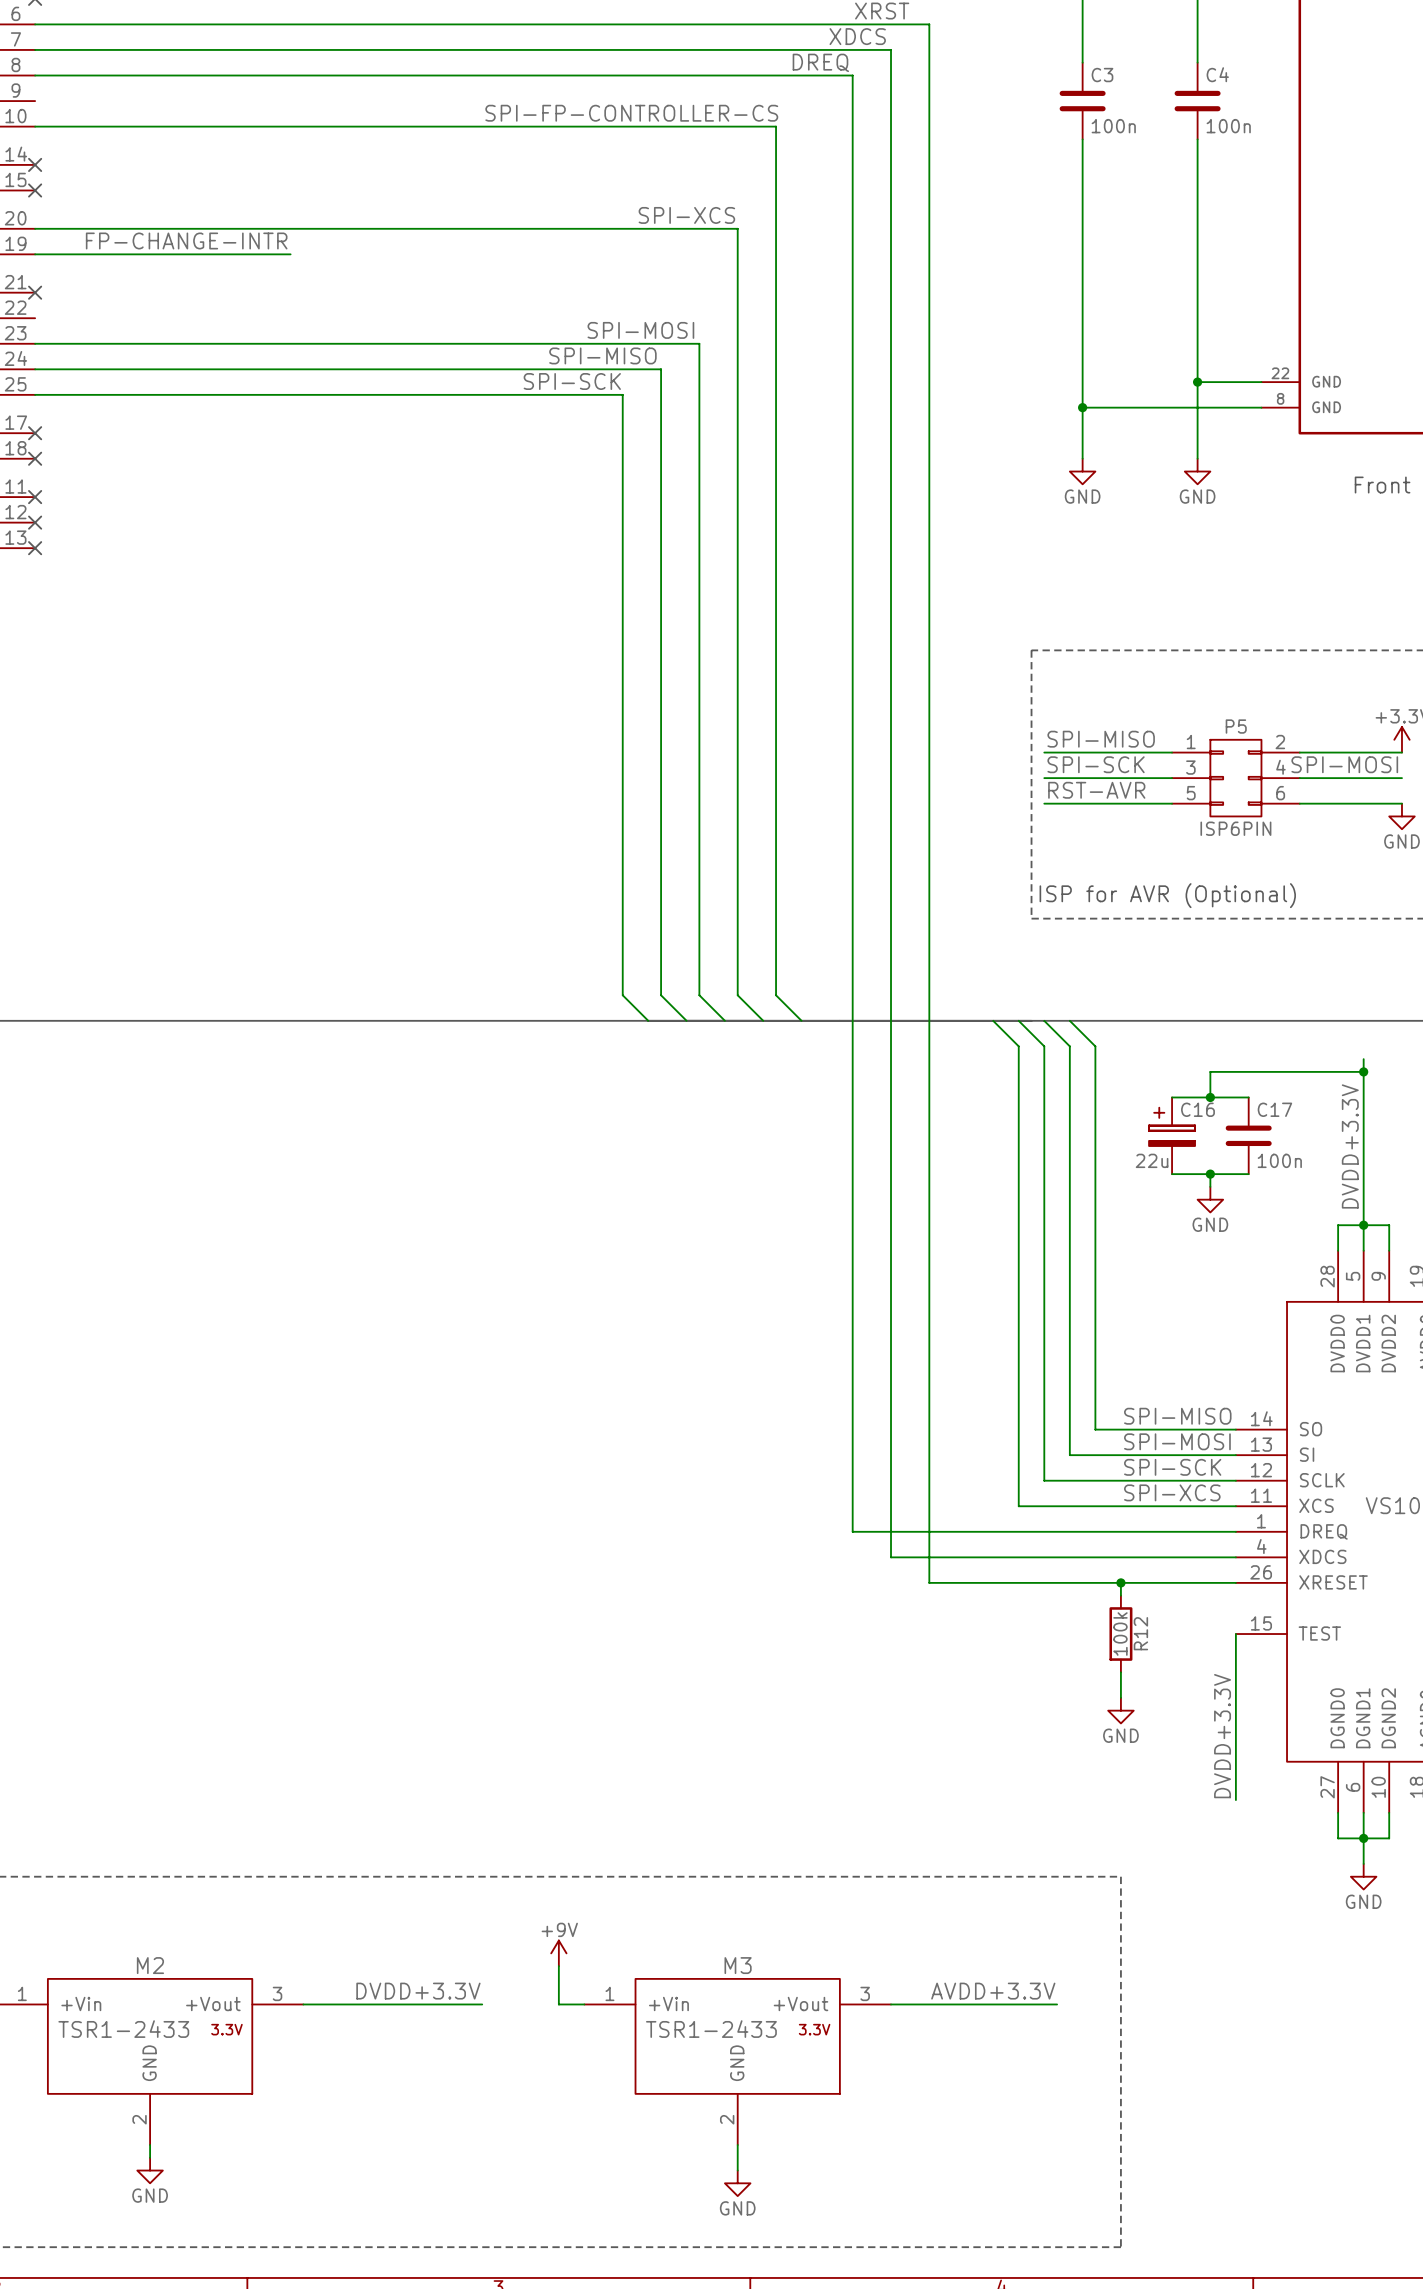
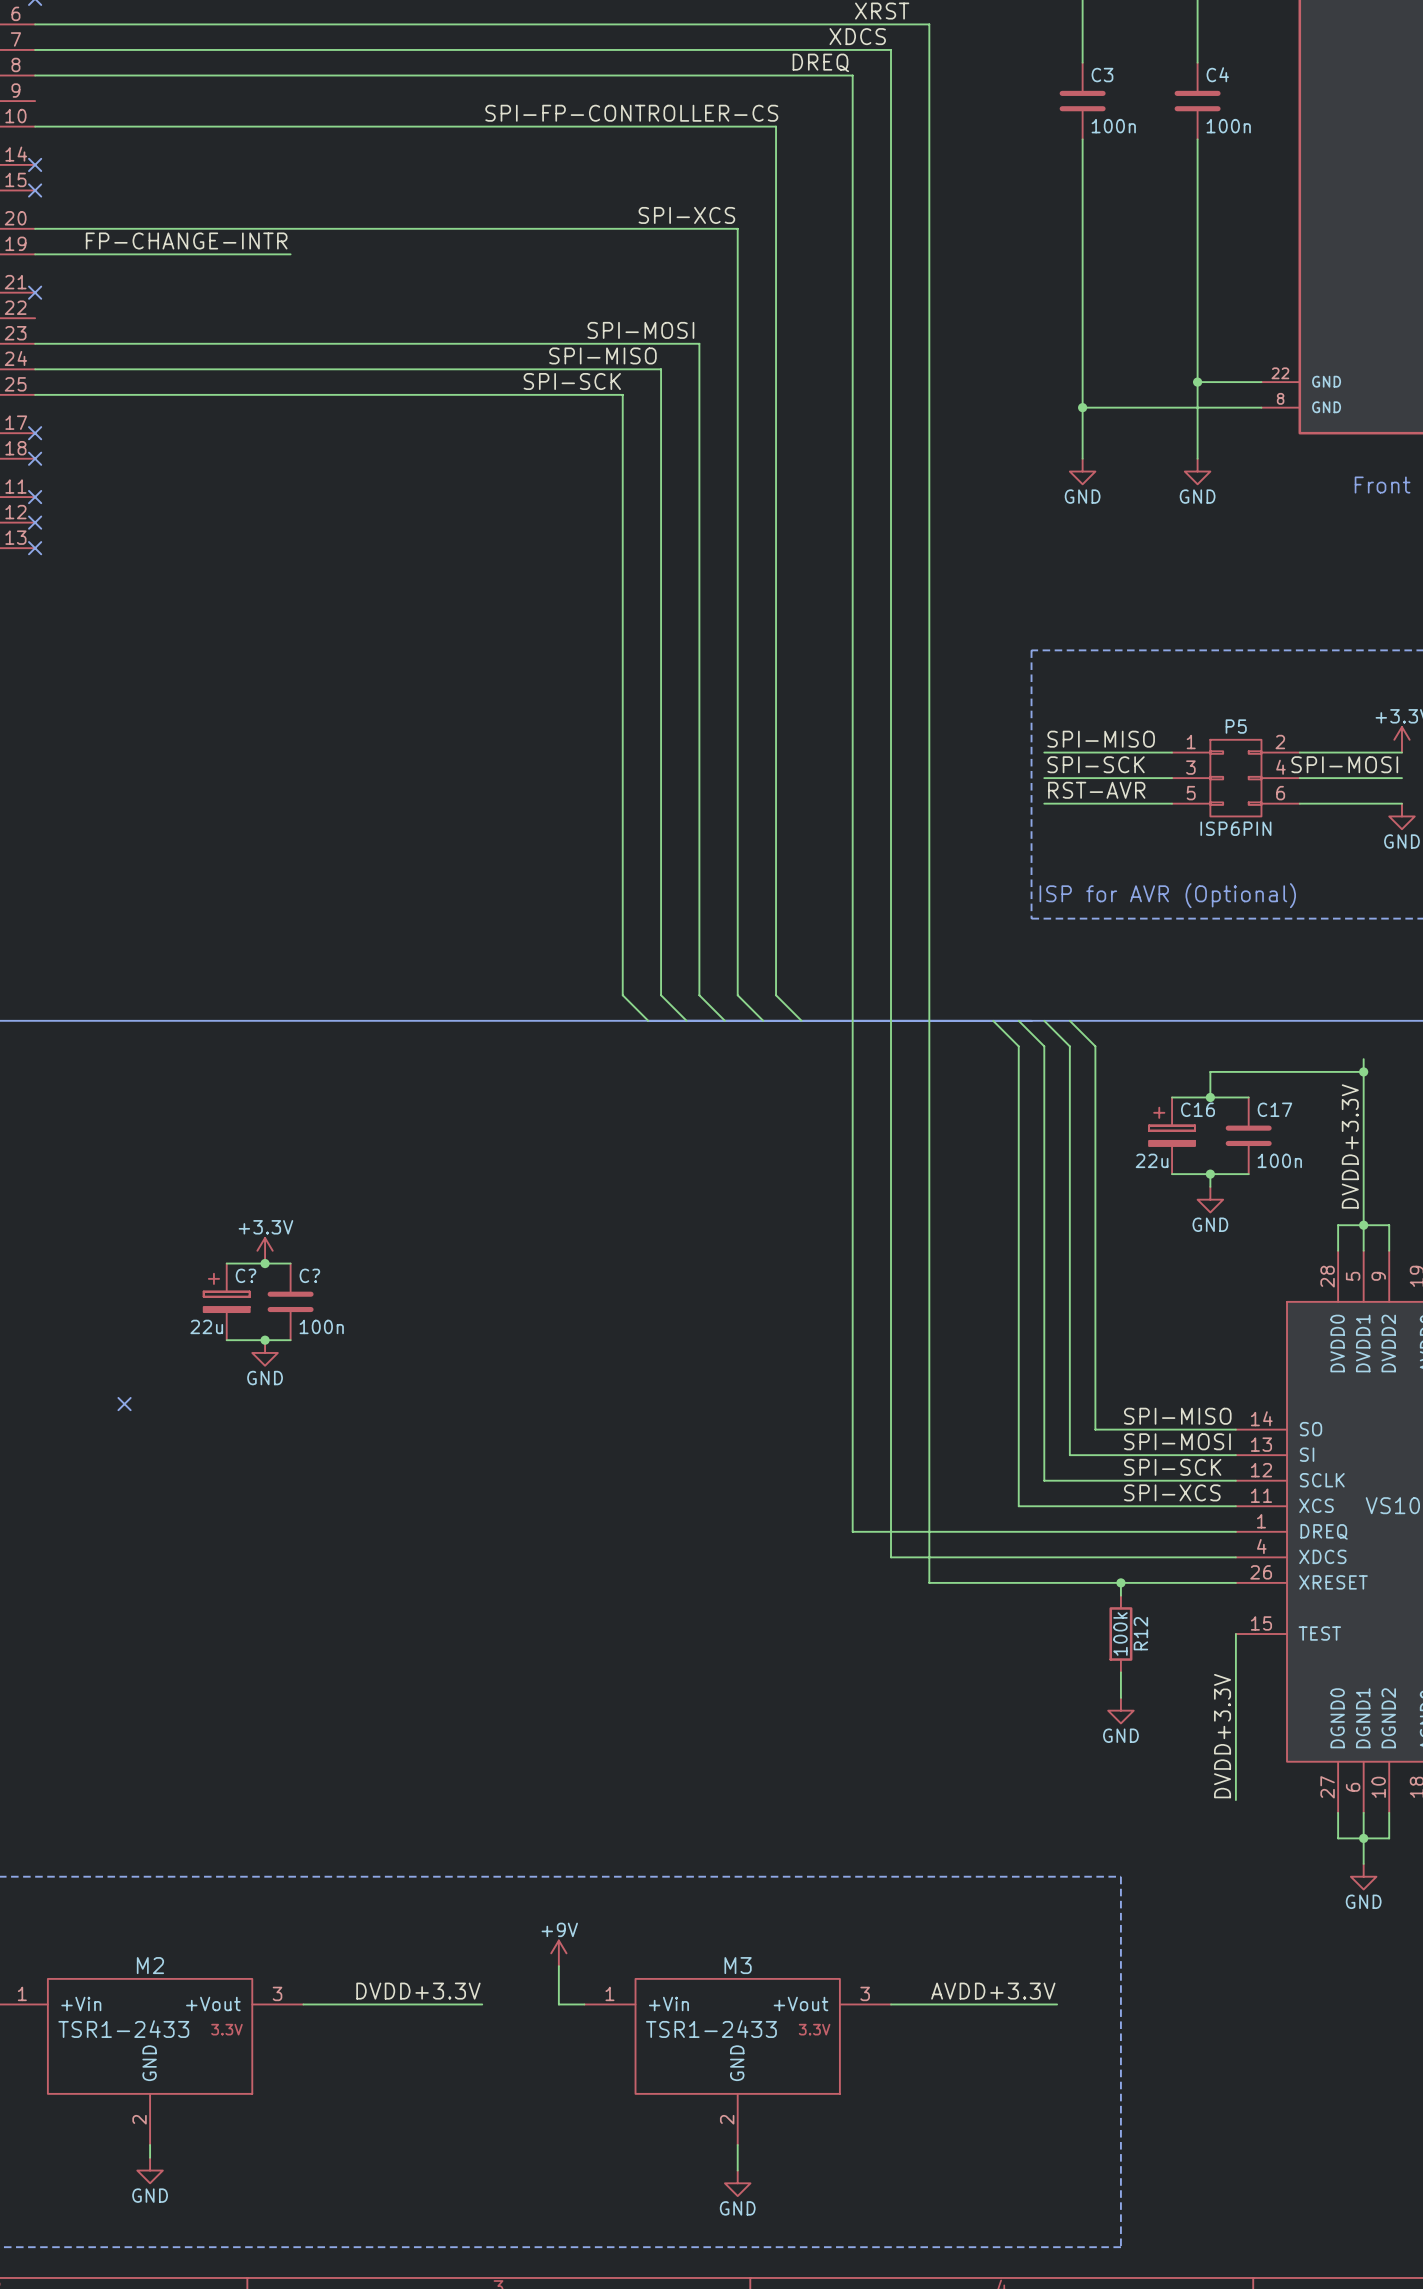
power symbol: none -> +3.3V (265, 1250)
wire: none -> (226, 1263) (290, 1263)
junction: none -> (265, 1263)
C?: none -> 22u (226, 1301)
C?: none -> 100n (290, 1301)
wire: none -> (226, 1340) (290, 1340)
junction: none -> (265, 1340)
power symbol: none -> GND (265, 1352)
no-connect mark: none -> (124, 1404)

